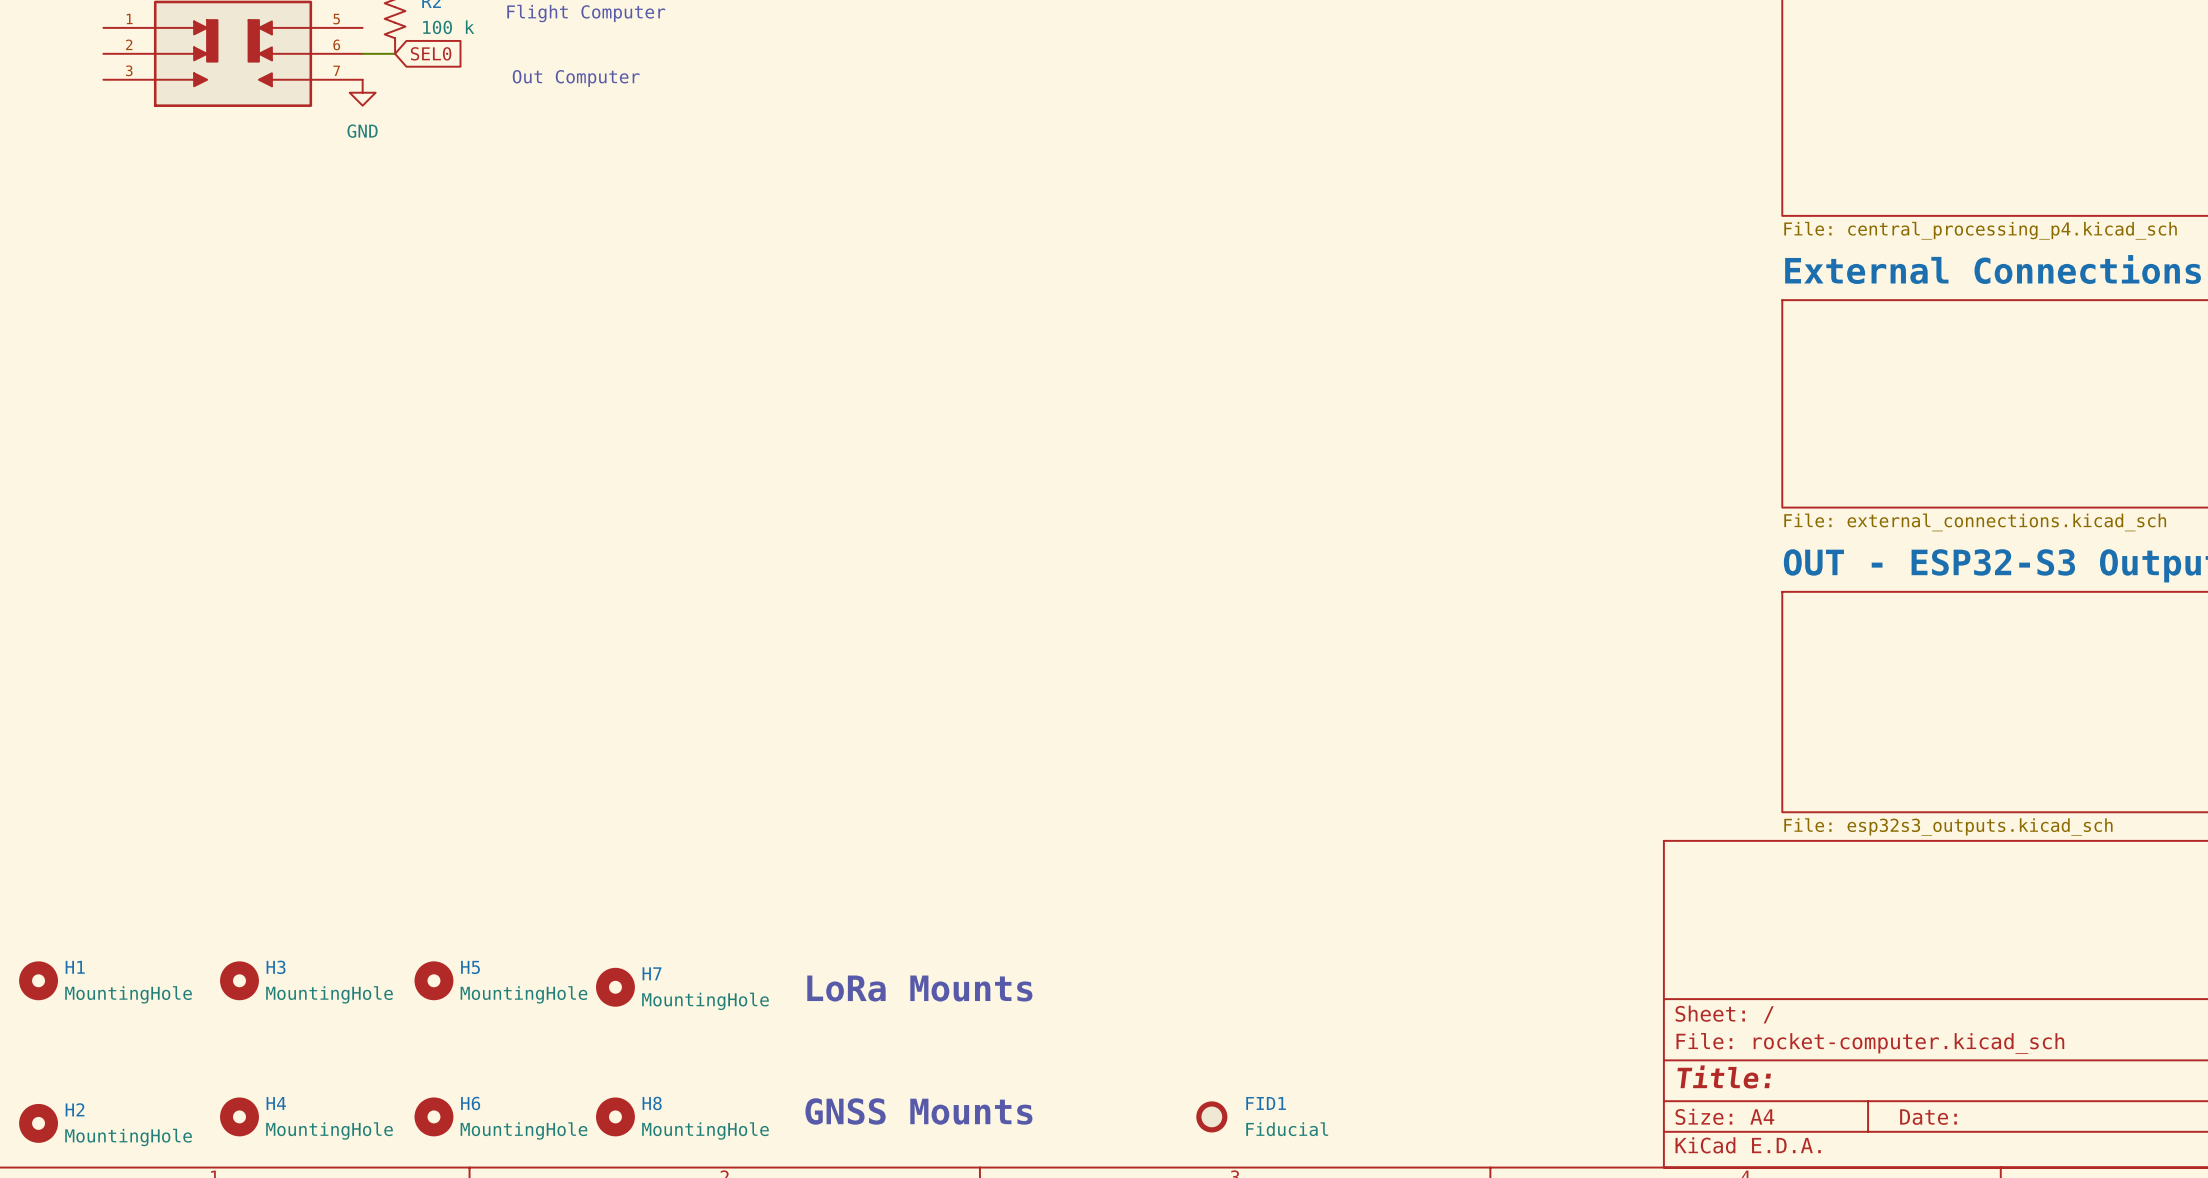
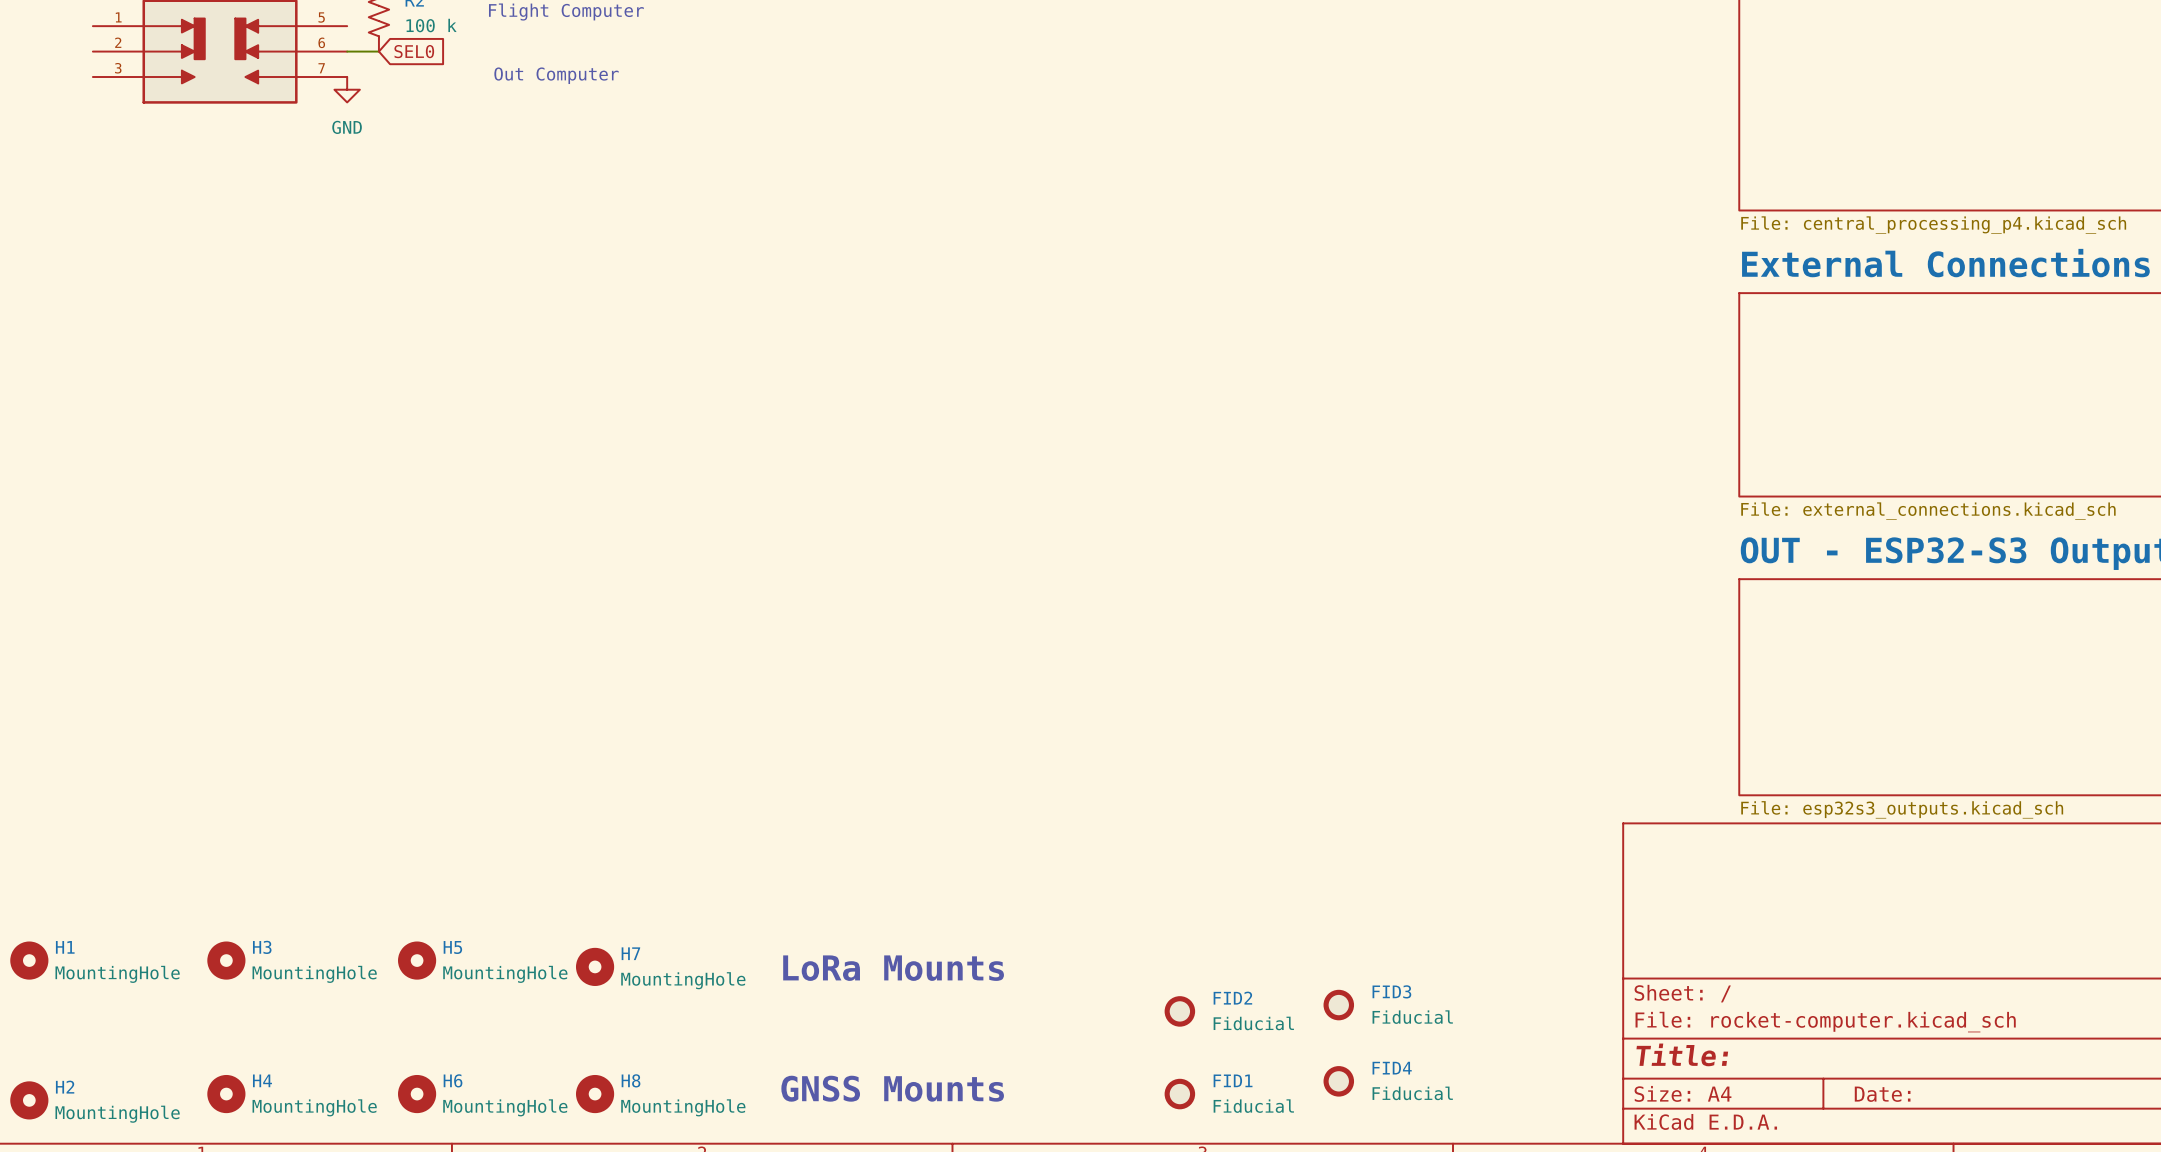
FID3: none -> Fiducial (1338, 1005)
FID2: none -> Fiducial (1179, 1011)
FID4: none -> Fiducial (1338, 1081)

